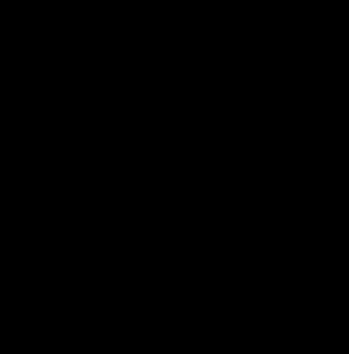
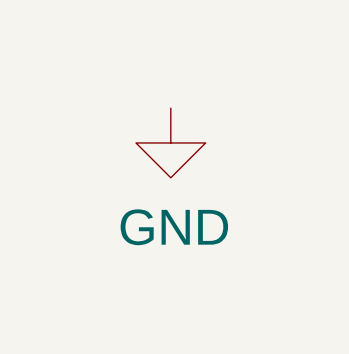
power symbol: none -> GND (170, 142)

